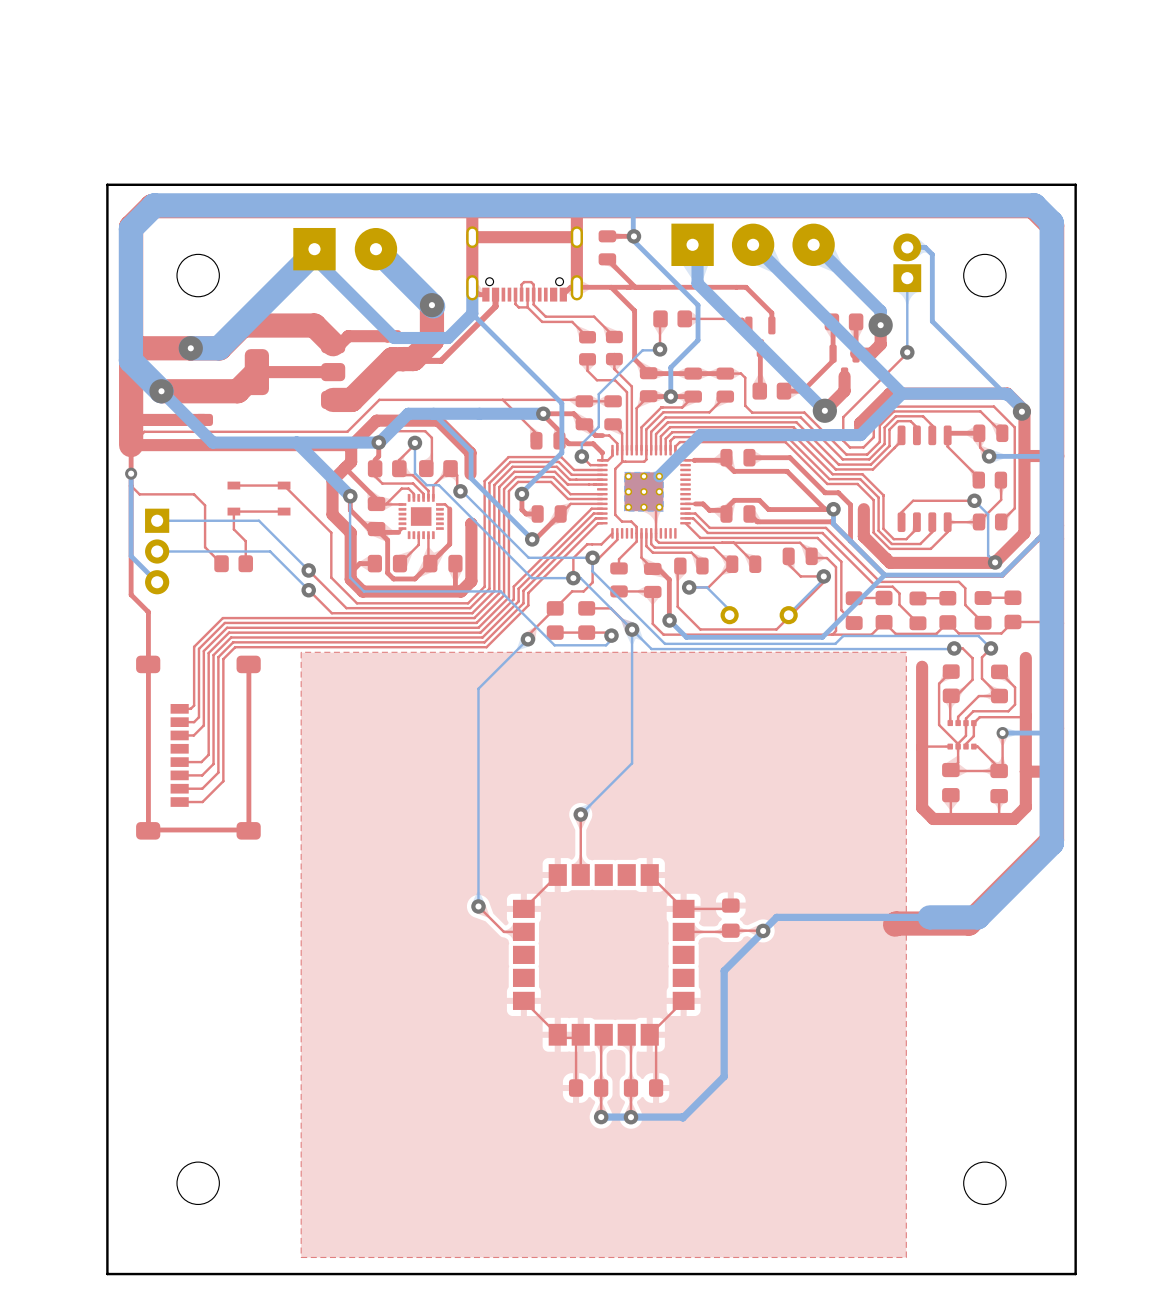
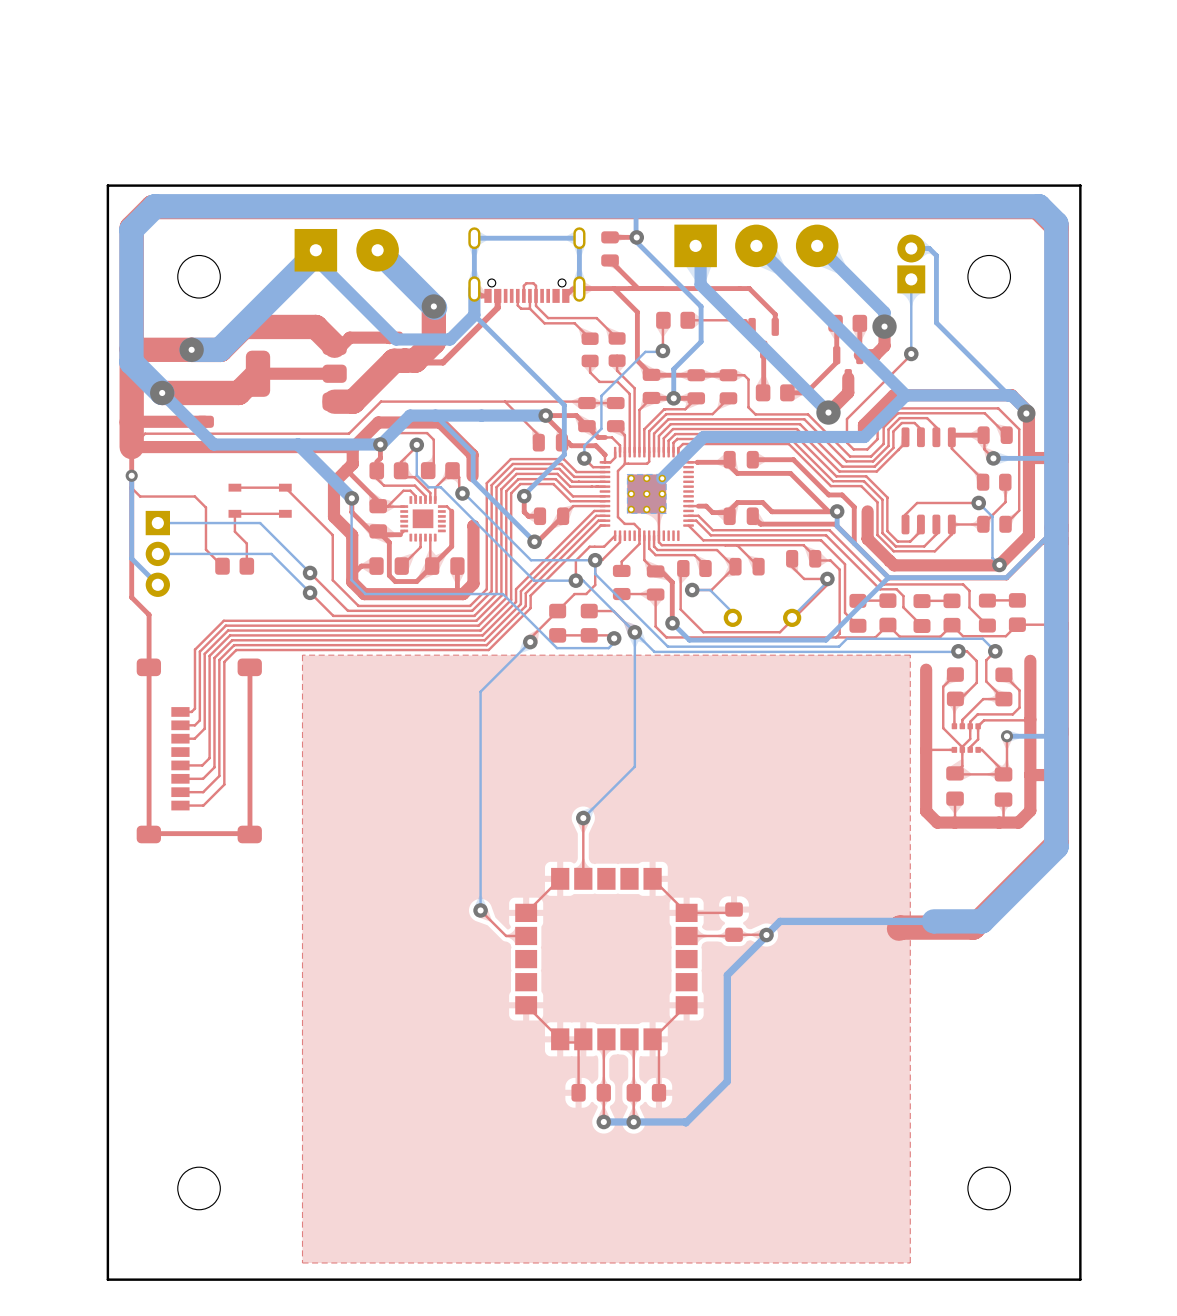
top track: (469, 206) (472, 208) (472, 287) -> none
top track: (575, 206) (576, 287) -> none
top track: (576, 237) (472, 237) -> none
bottom track: none -> (579, 289) (579, 238) (474, 238) (474, 289)

